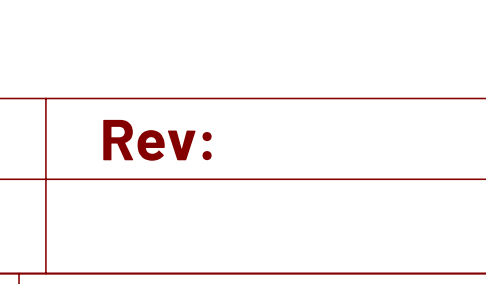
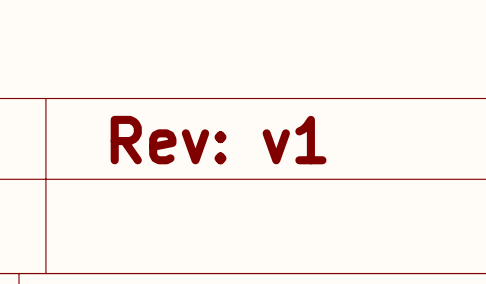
title block: Rev: (157, 140) -> Rev: v1 (218, 140)

